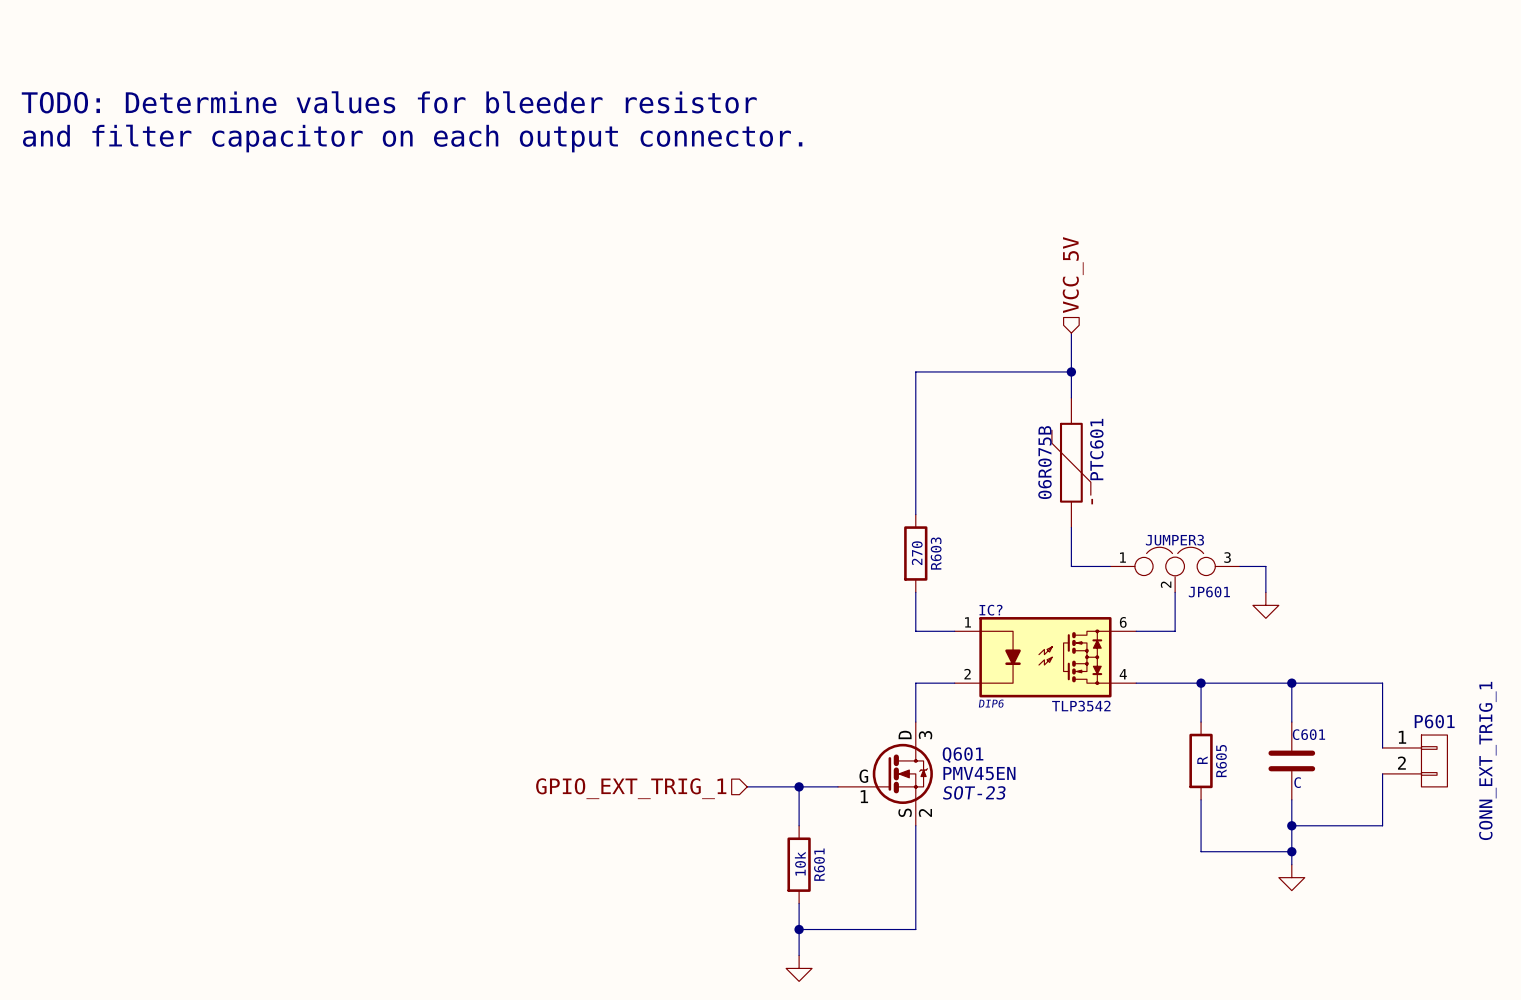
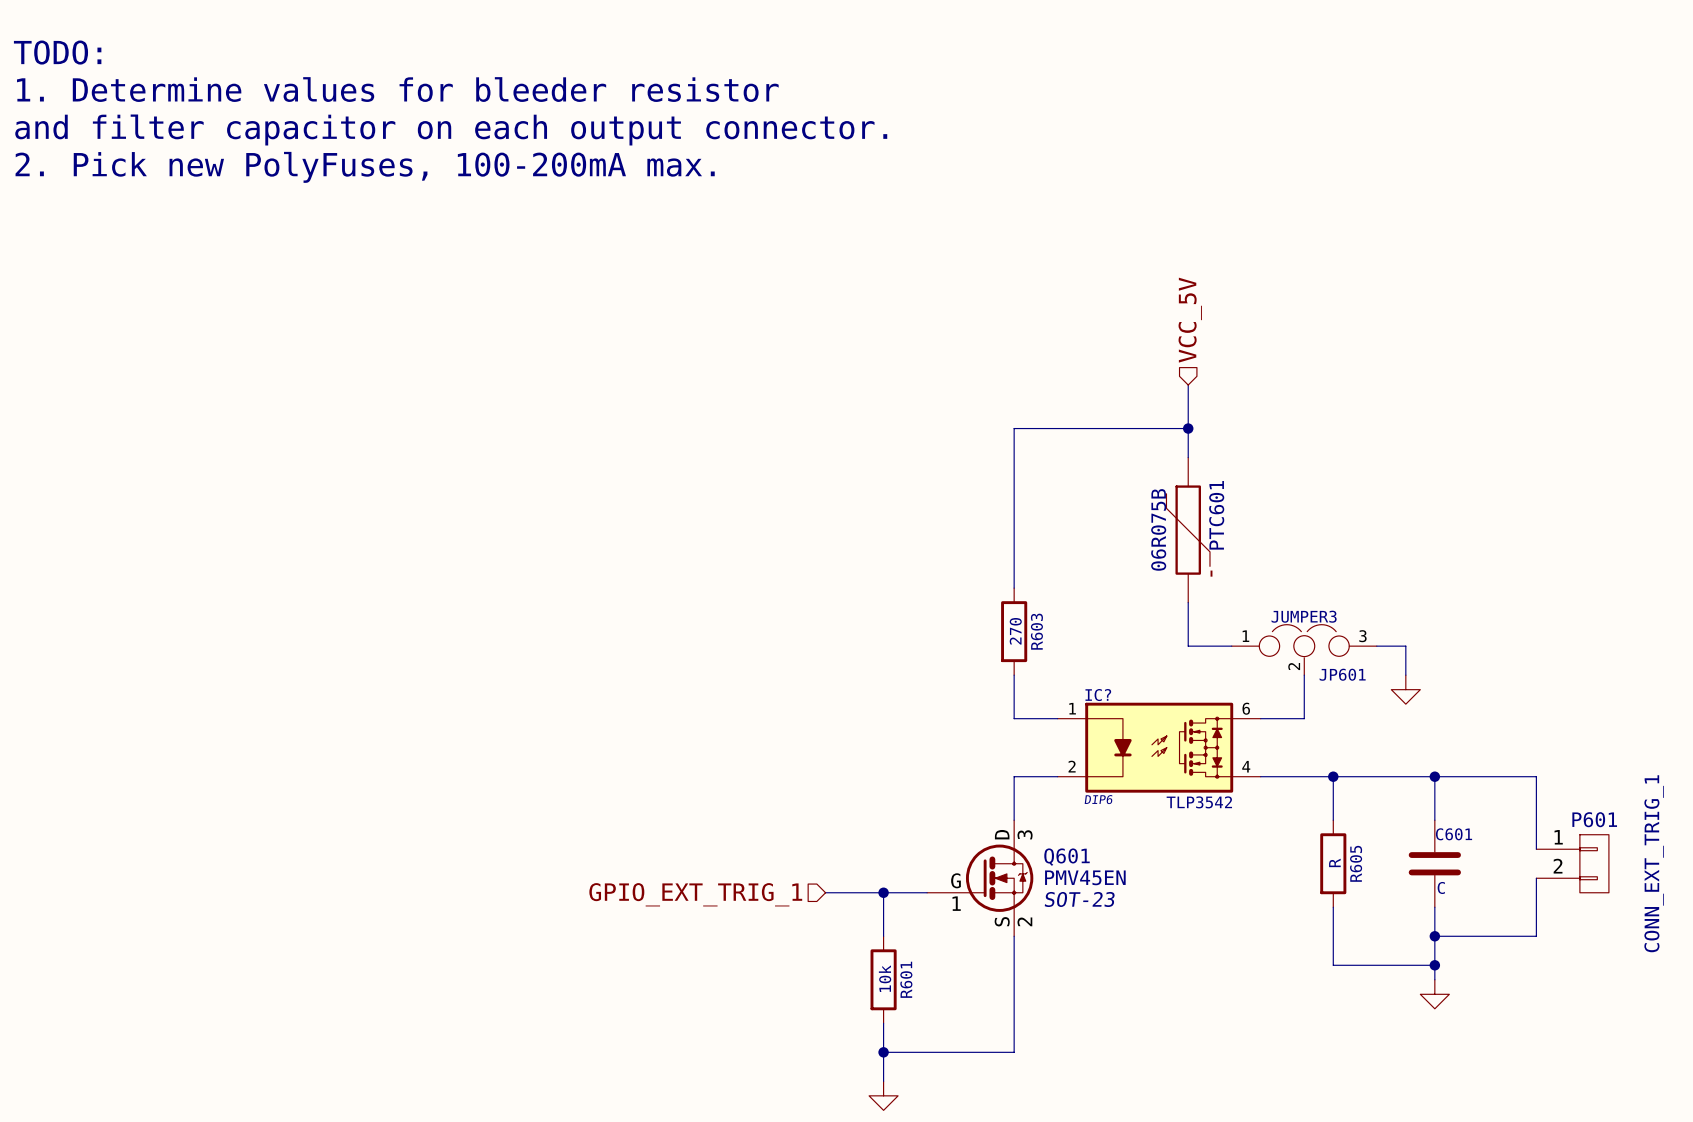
text: none -> TODO: (57, 52)
text: none -> 1. Determine values for bleeder resistor (397, 89)
text: TODO: Determine values for bleeder resistor (389, 102) -> and filter capacitor on each output connector. (451, 129)
text: and filter capacitor on each output connector. (412, 138) -> 2. Pick new PolyFuses, 100-200mA max. (365, 167)

